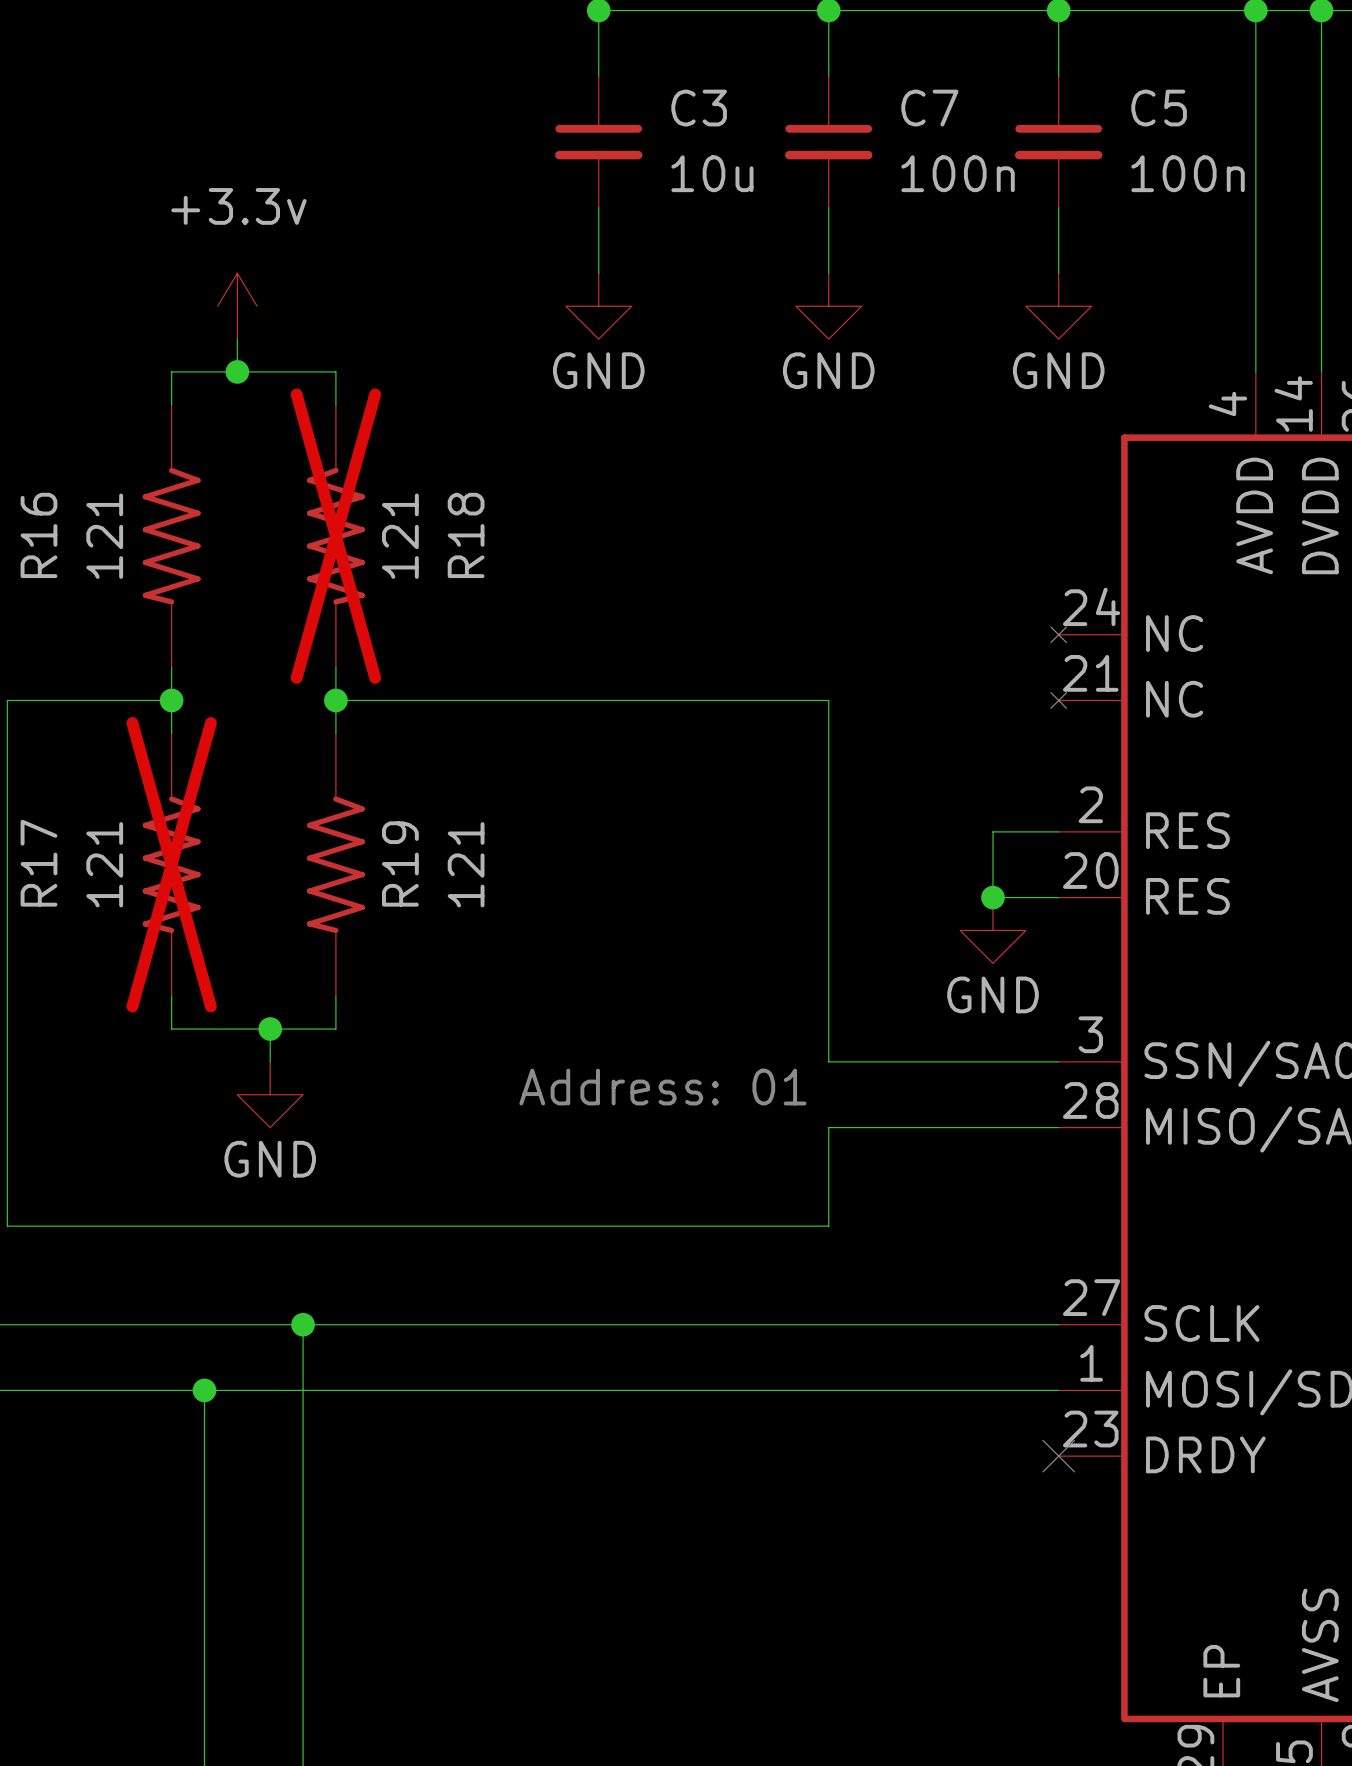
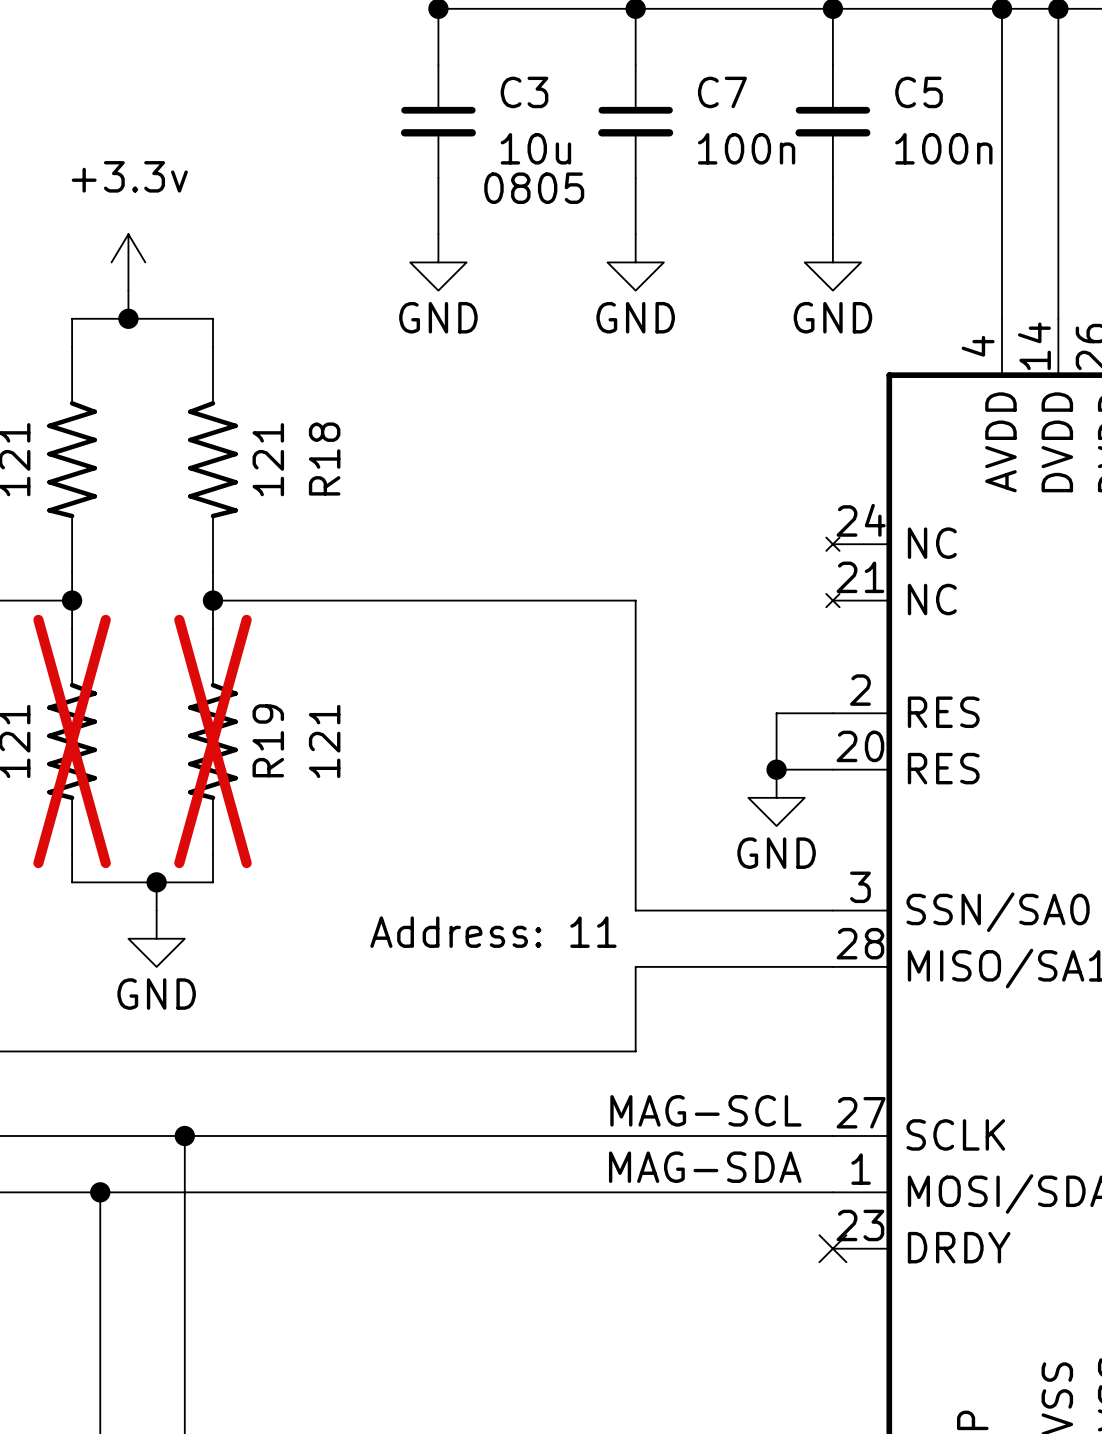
text: none -> 0805 (534, 188)
R18 do-not-place cross: (335, 536) -> none
R19 do-not-place cross: none -> (212, 741)
text: Address: 01 (662, 1087) -> Address: 11 (493, 932)
label: none -> MAG-SCL (705, 1110)
label: none -> MAG-SDA (705, 1167)

